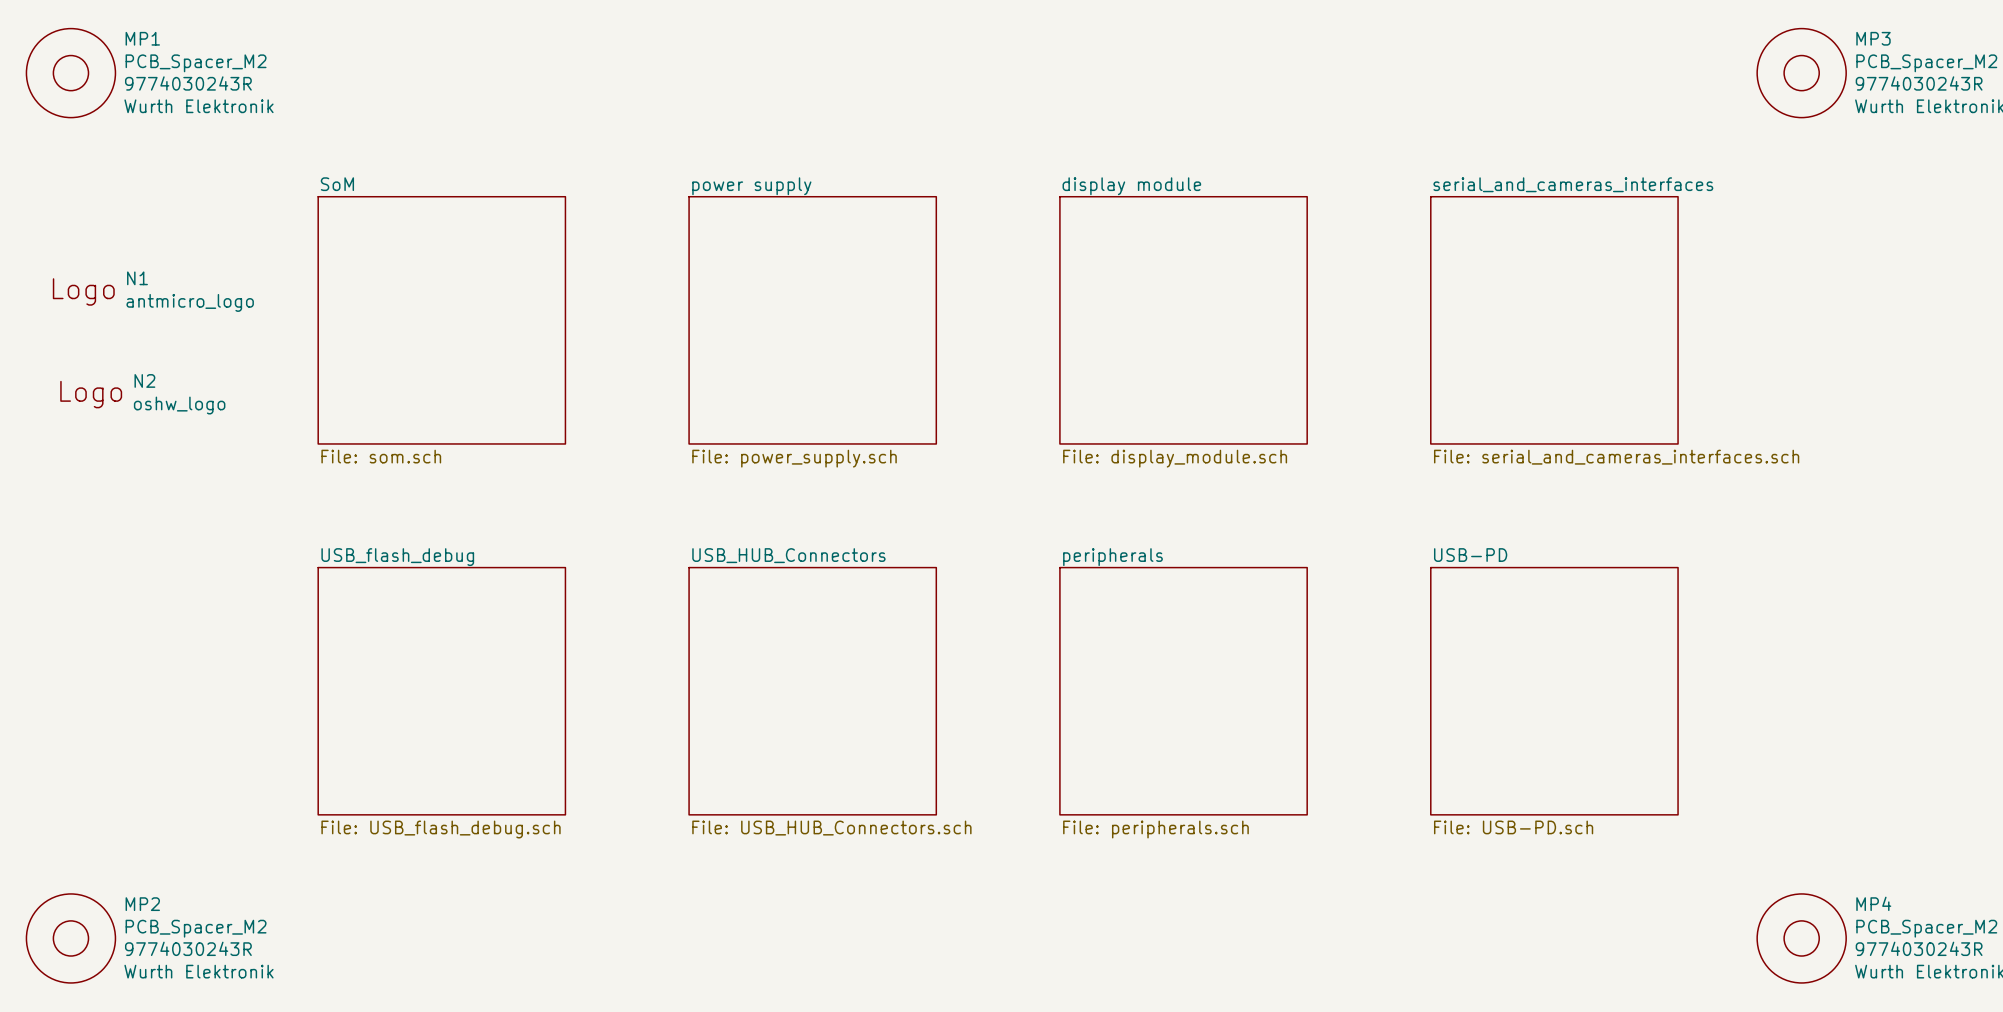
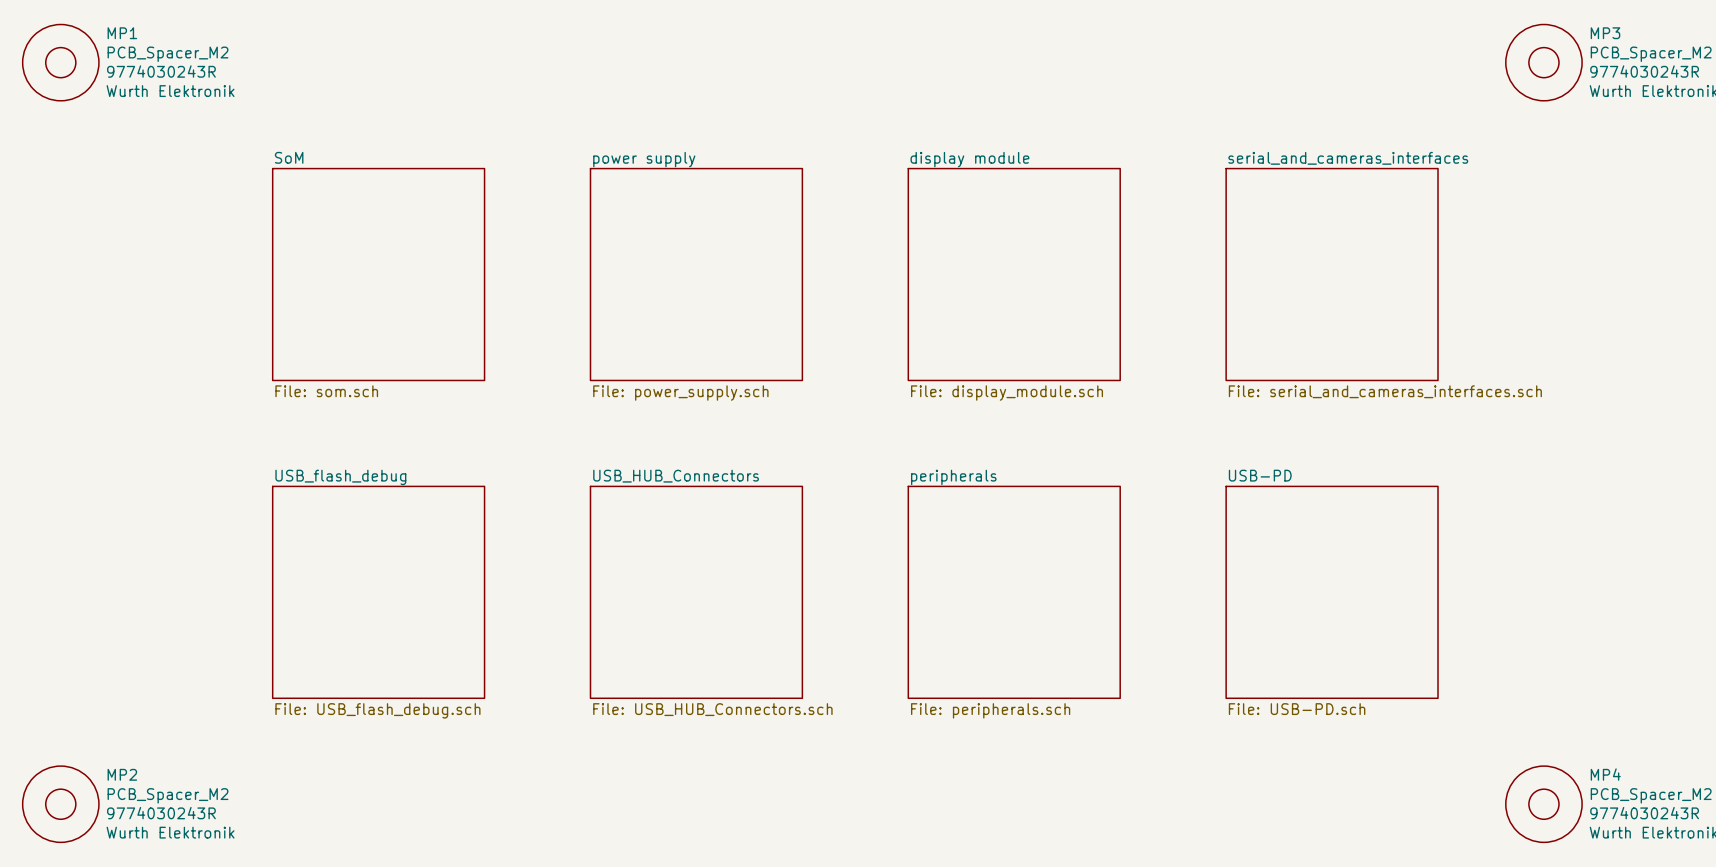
N1: antmicro_logo (153, 291) -> none
N2: oshw_logo (142, 394) -> none

